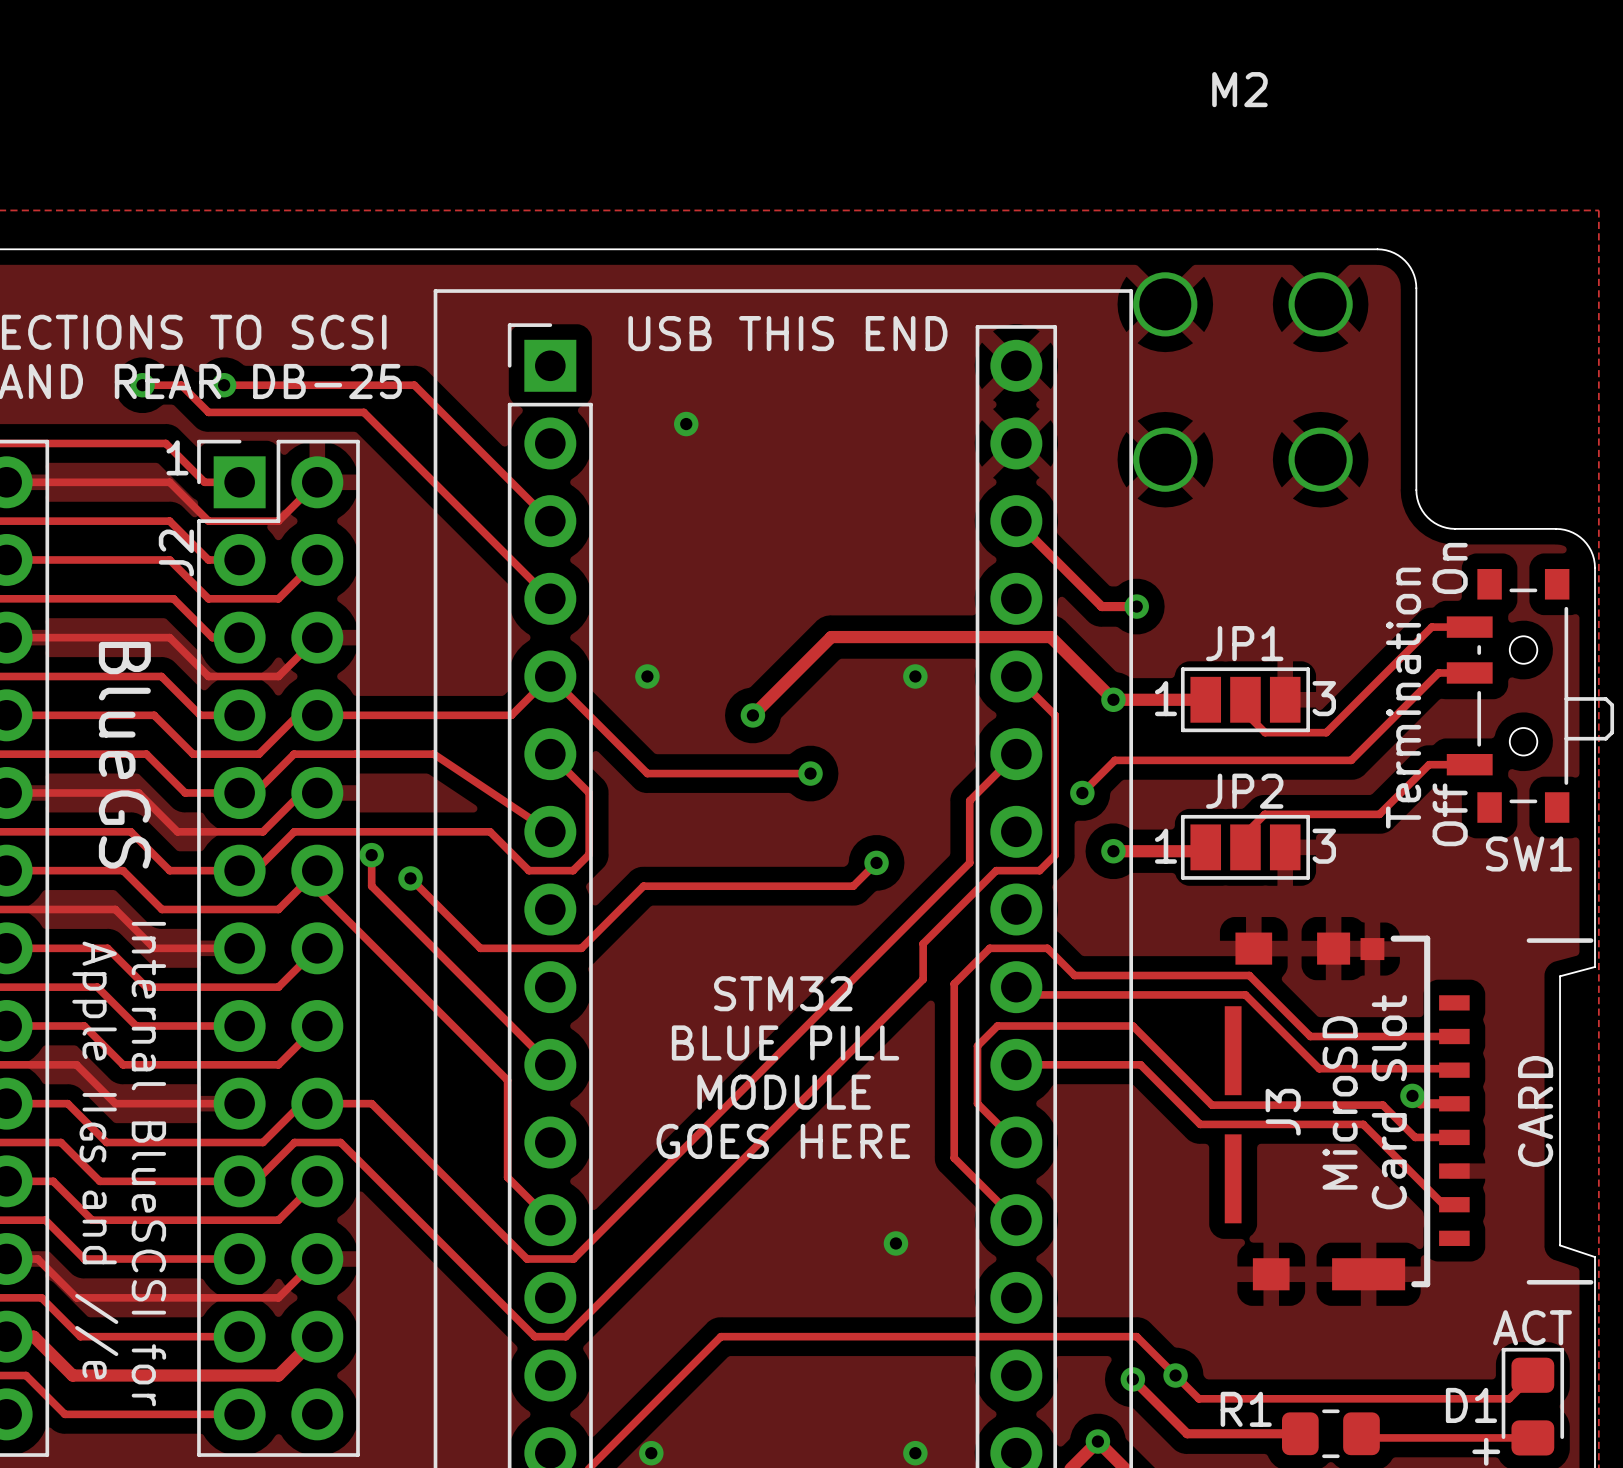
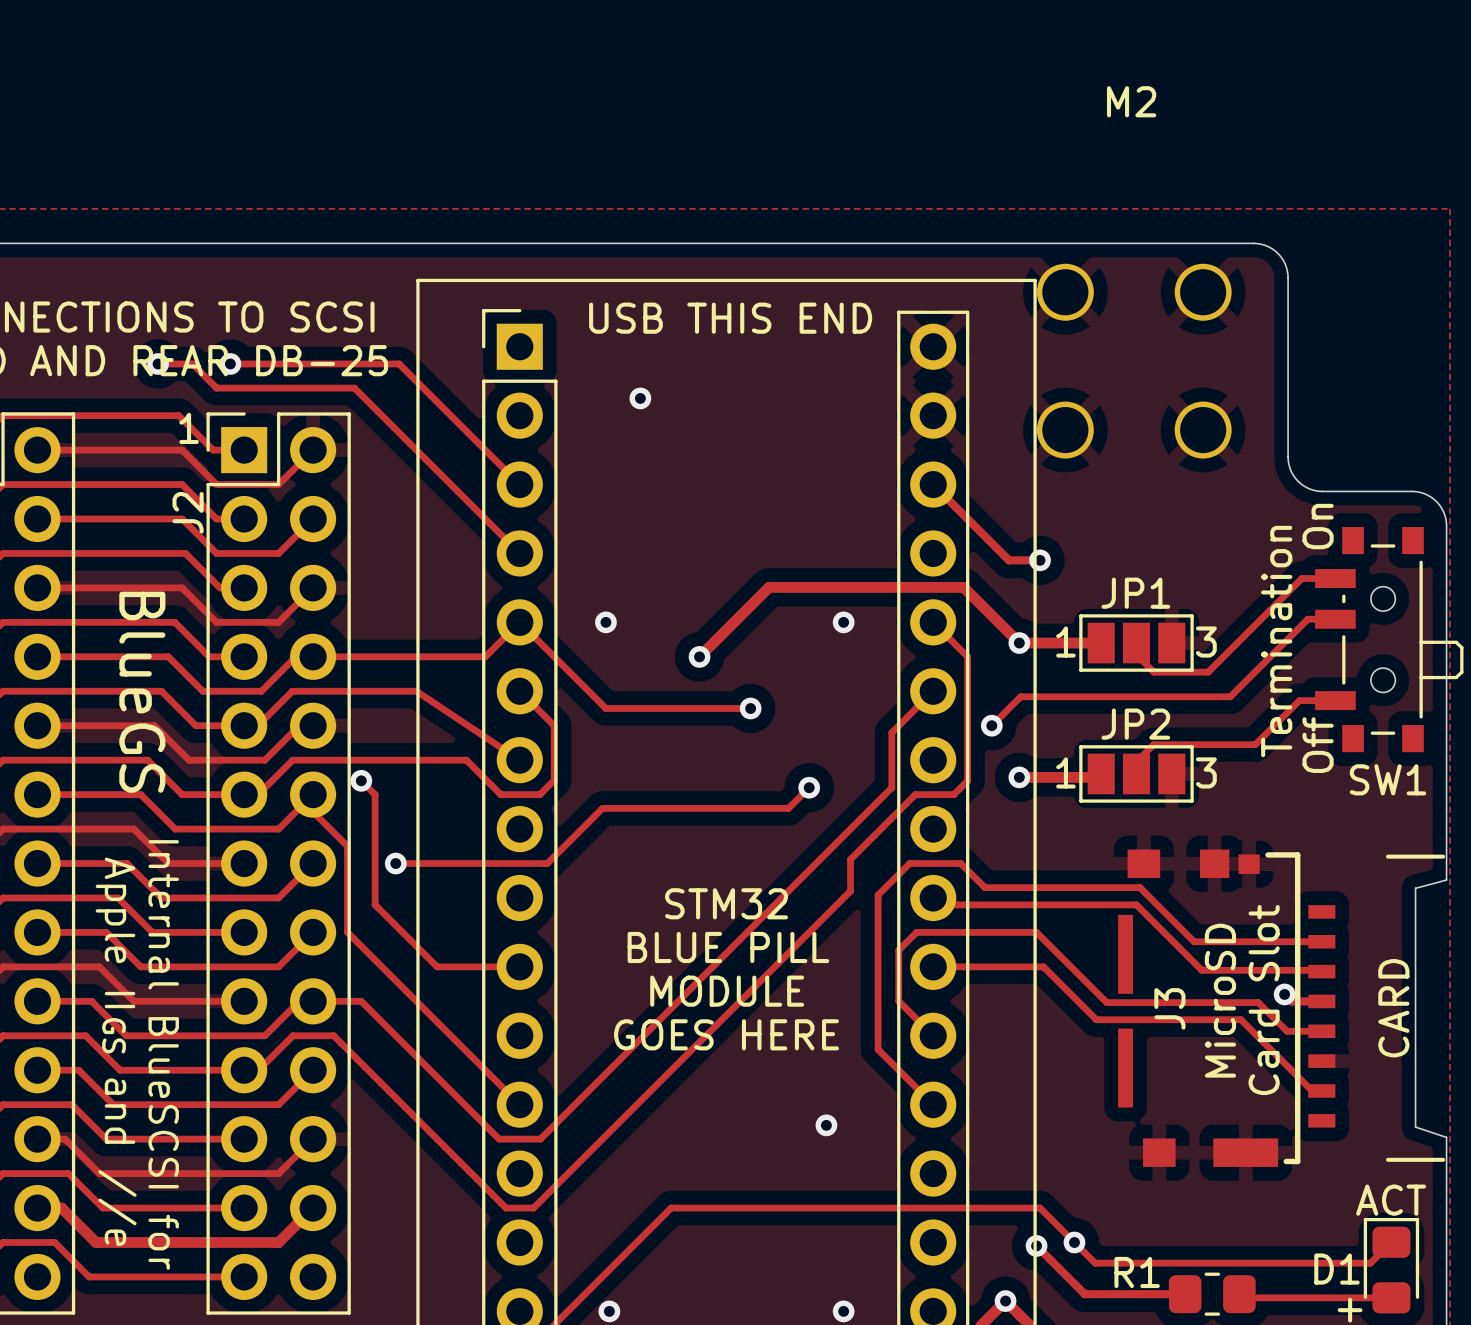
track: (371, 855) (371, 886) (550, 1064) -> (361, 780) (375, 794) (375, 904) (437, 966) (519, 966)
track: (410, 878) (480, 948) -> (395, 863) (457, 863)
via position: (410, 878) -> (395, 863)
track: (356, 928) (507, 1080) (507, 1177) -> (347, 846) (347, 932) (481, 1066)

